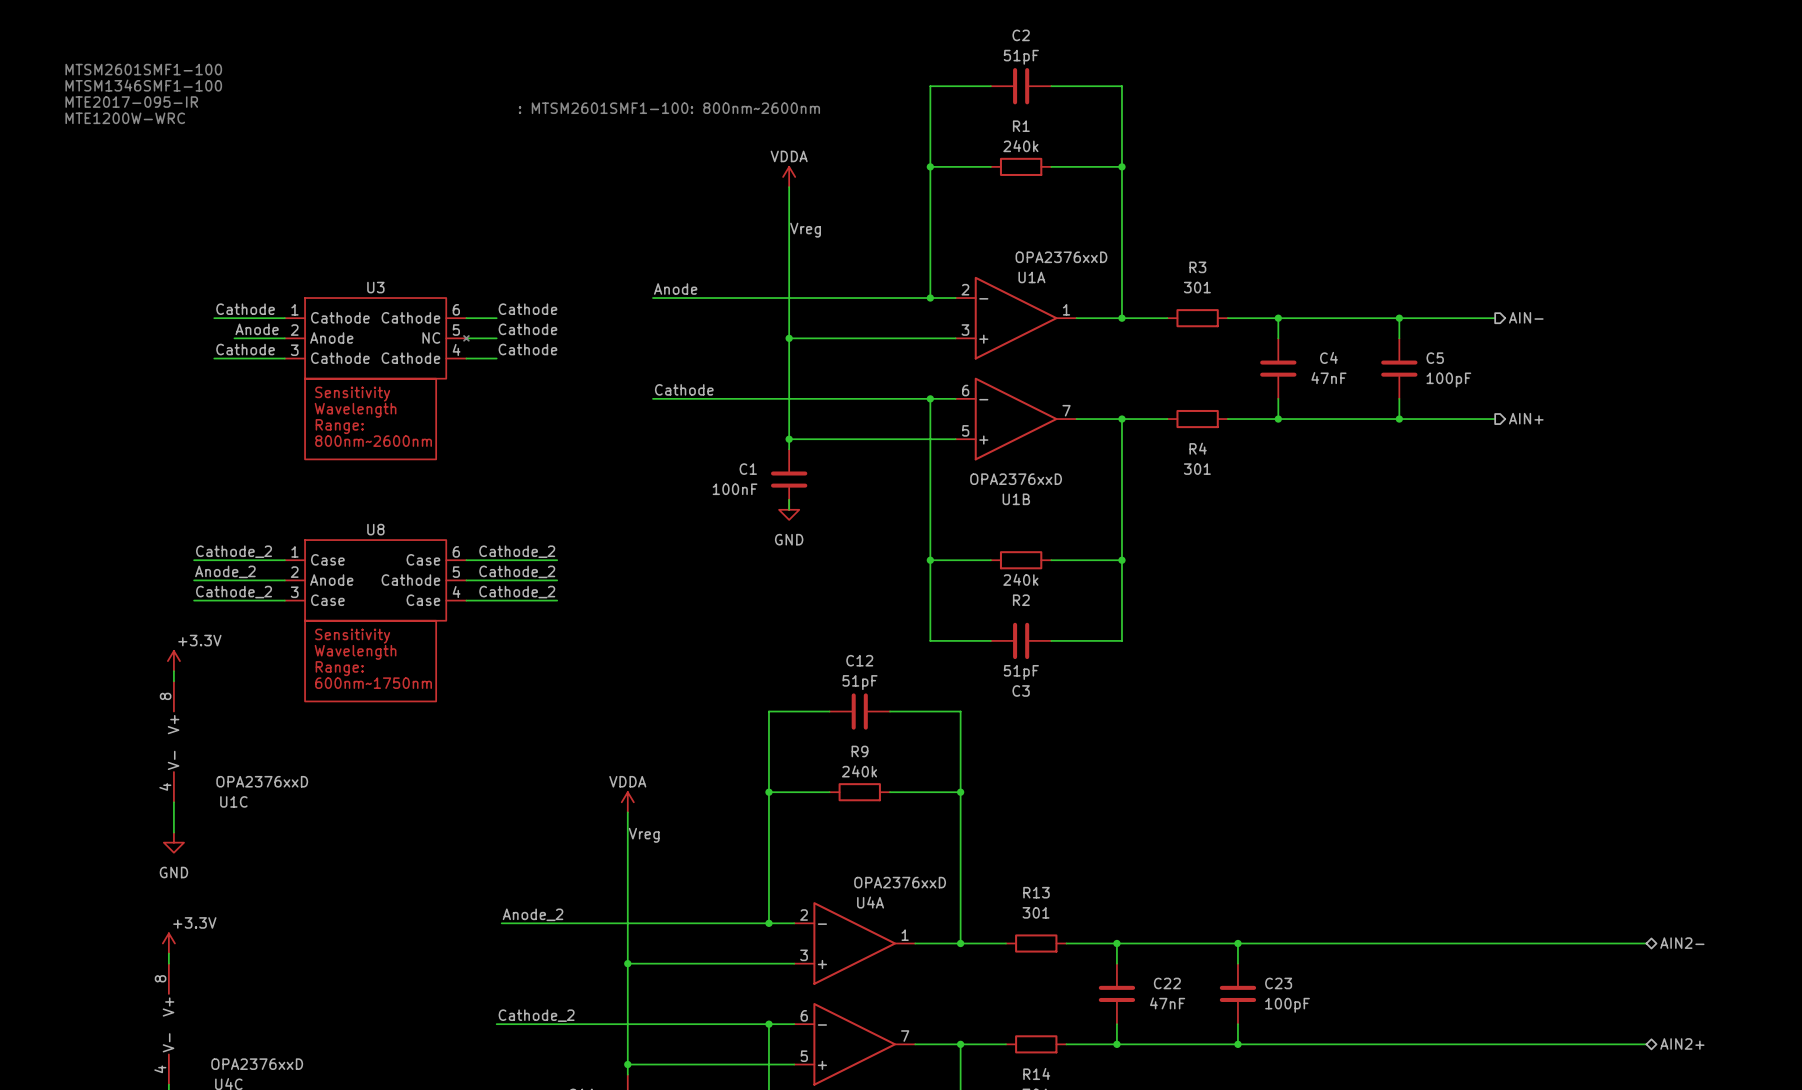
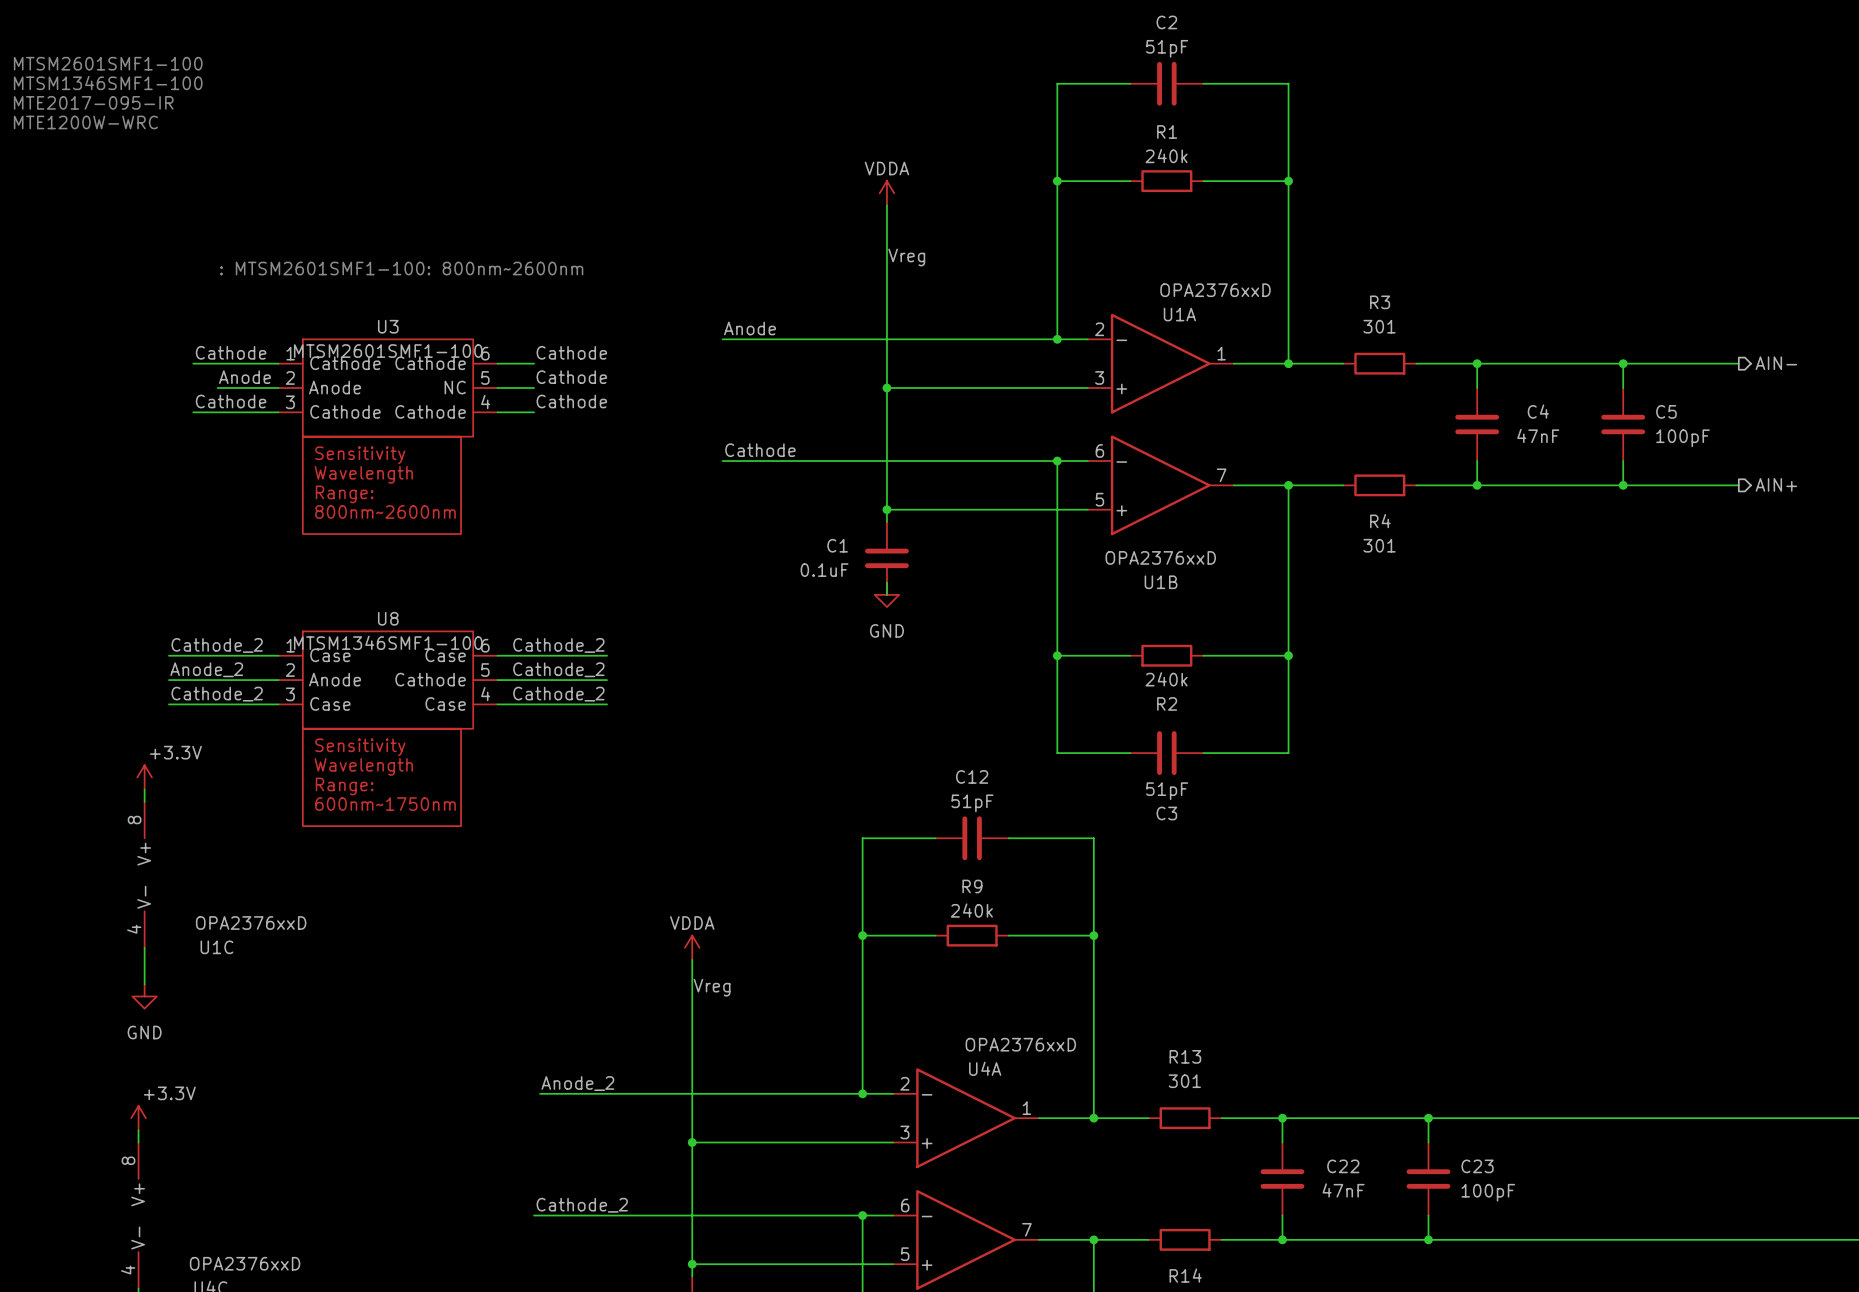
text: : MTSM2601SMF1-100: 800nm~2600nm (669, 108) -> none
text: none -> : MTSM2601SMF1-100: 800nm~2600nm (401, 268)
U3 symbol: [284, 298, 469, 460] -> [278, 339, 498, 535]
U3 value: none -> MTSM2601SMF1-100 (388, 351)
C1 value: 100nF (735, 489) -> 0.1uF (824, 570)
U8 value: none -> MTSM1346SMF1-100 (388, 642)

